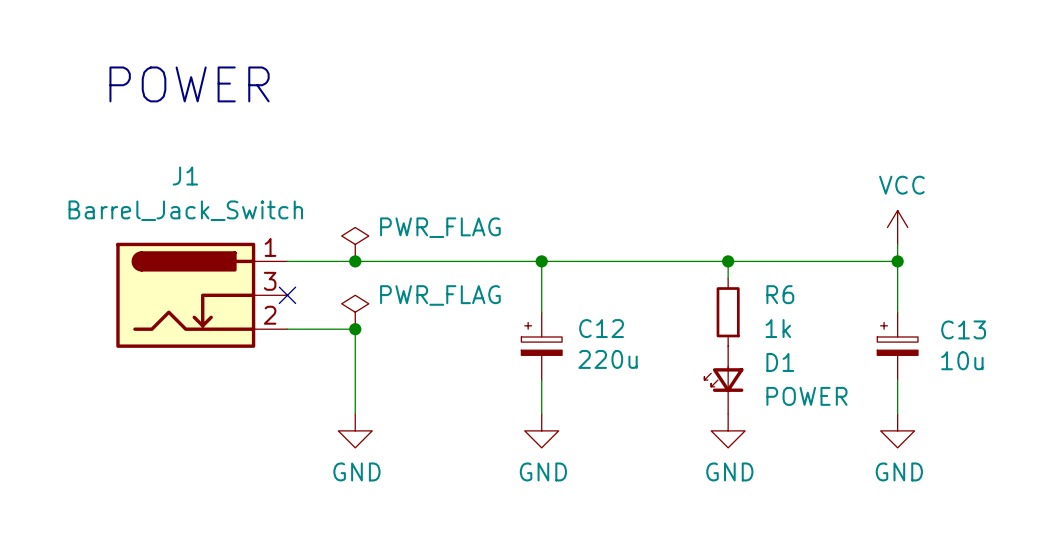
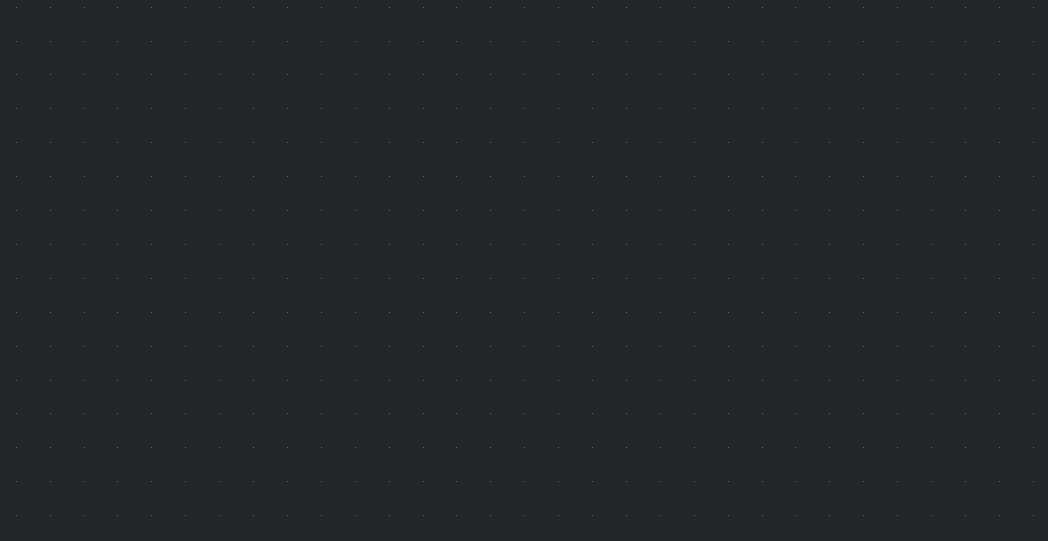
text: POWER (189, 84) -> none
power symbol: VCC (897, 227) -> none
power symbol: PWR_FLAG (355, 244) -> none
wire: (897, 244) (897, 312) -> none
wire: (287, 261) (897, 261) -> none
junction: (355, 261) -> none
wire: (541, 261) (541, 312) -> none
junction: (541, 261) -> none
wire: (728, 261) (728, 278) -> none
junction: (728, 261) -> none
junction: (897, 261) -> none
J1: Barrel_Jack_Switch (201, 295) -> none
no-connect mark: (287, 295) -> none
power symbol: PWR_FLAG (355, 312) -> none
R6: 1k (728, 312) -> none
wire: (287, 329) (355, 329) (355, 413) -> none
junction: (355, 329) -> none
C12: 220u (541, 346) -> none
C13: 10u (897, 346) -> none
wire: (541, 380) (541, 413) -> none
D1: POWER (723, 380) -> none
wire: (897, 380) (897, 413) -> none
power symbol: GND (355, 430) -> none
power symbol: GND (541, 430) -> none
power symbol: GND (728, 430) -> none
power symbol: GND (897, 430) -> none

